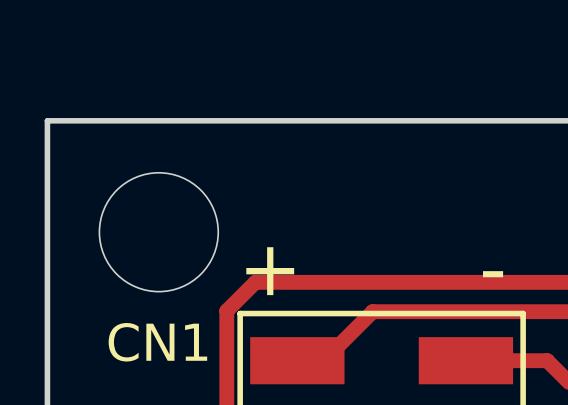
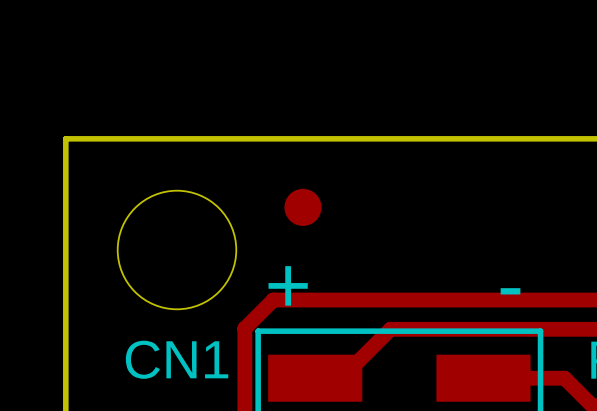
part: none -> (302, 207)

